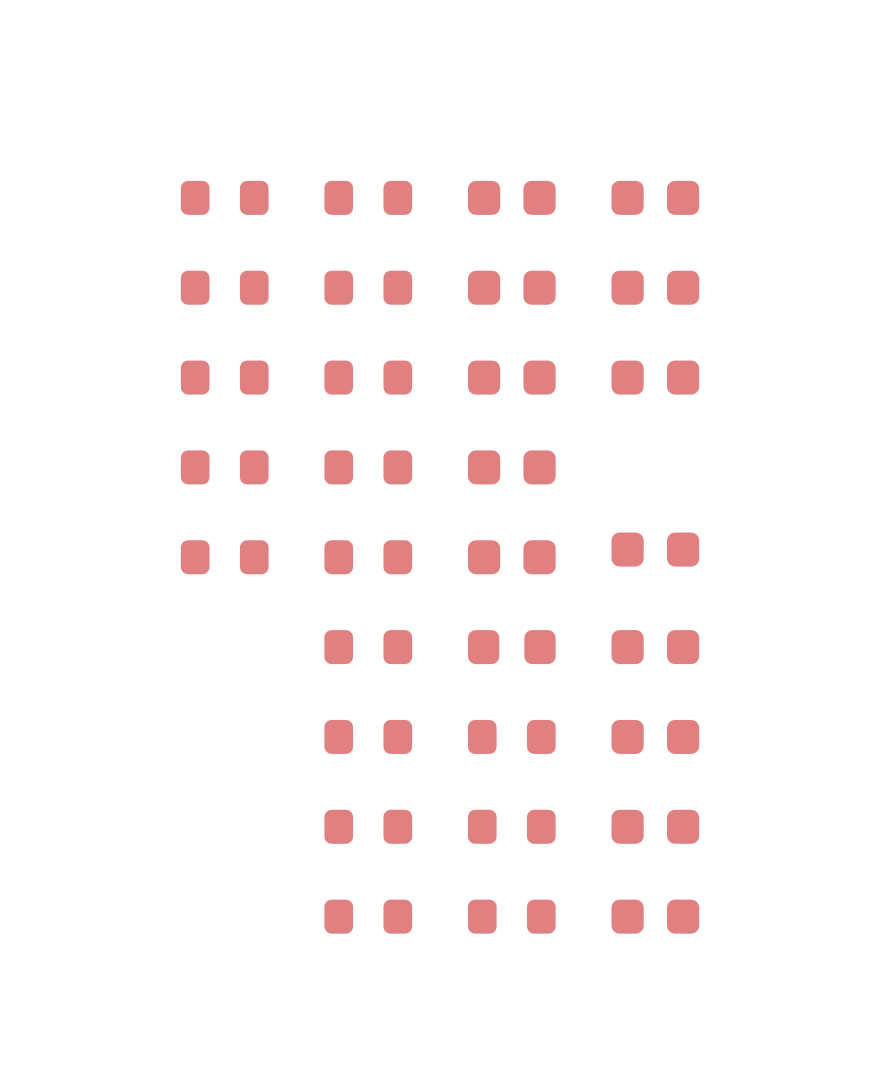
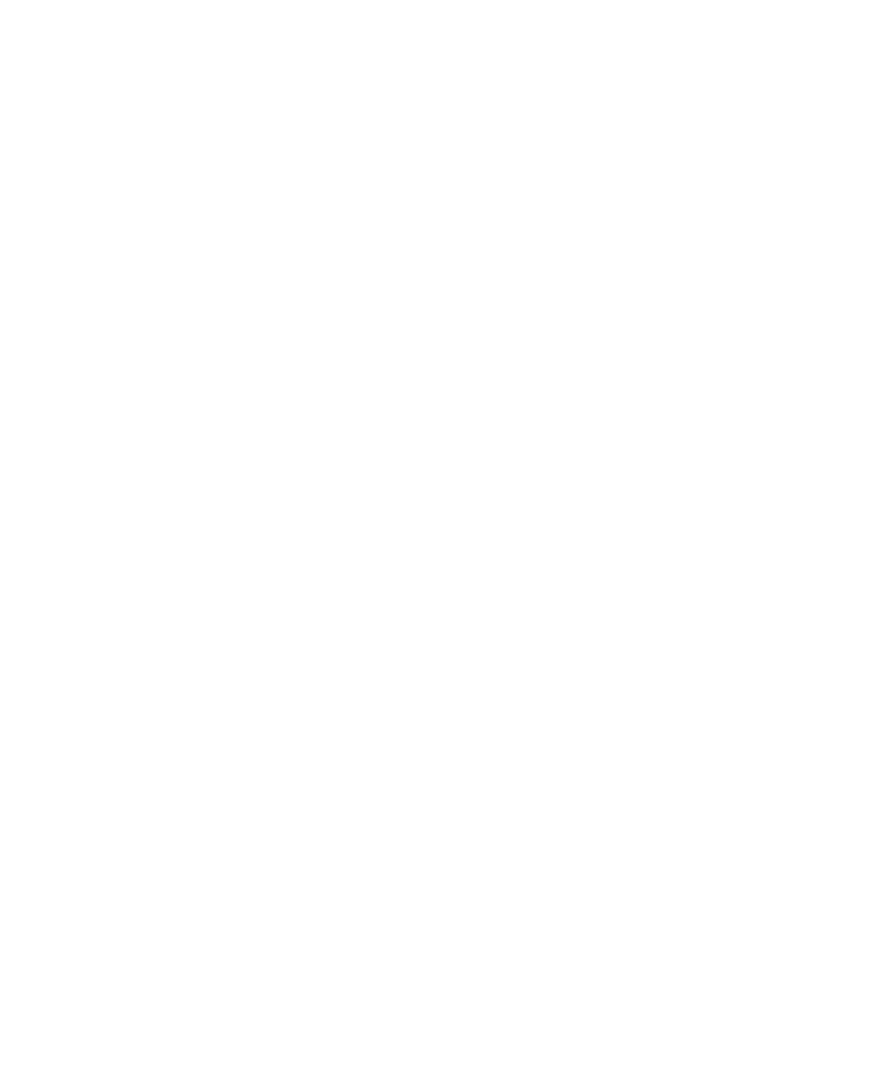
part: (224, 197) -> none
part: (368, 197) -> none
part: (511, 197) -> none
part: (655, 197) -> none
part: (224, 287) -> none
part: (368, 287) -> none
part: (511, 287) -> none
part: (655, 287) -> none
part: (224, 377) -> none
part: (368, 377) -> none
part: (511, 377) -> none
part: (655, 377) -> none
part: (224, 467) -> none
part: (368, 467) -> none
part: (511, 467) -> none
part: (655, 549) -> none
part: (224, 557) -> none
part: (368, 557) -> none
part: (511, 557) -> none
part: (368, 647) -> none
part: (511, 647) -> none
part: (655, 647) -> none
part: (368, 736) -> none
part: (511, 736) -> none
part: (655, 736) -> none
part: (368, 826) -> none
part: (511, 826) -> none
part: (655, 826) -> none
part: (368, 916) -> none
part: (511, 916) -> none
part: (655, 916) -> none

